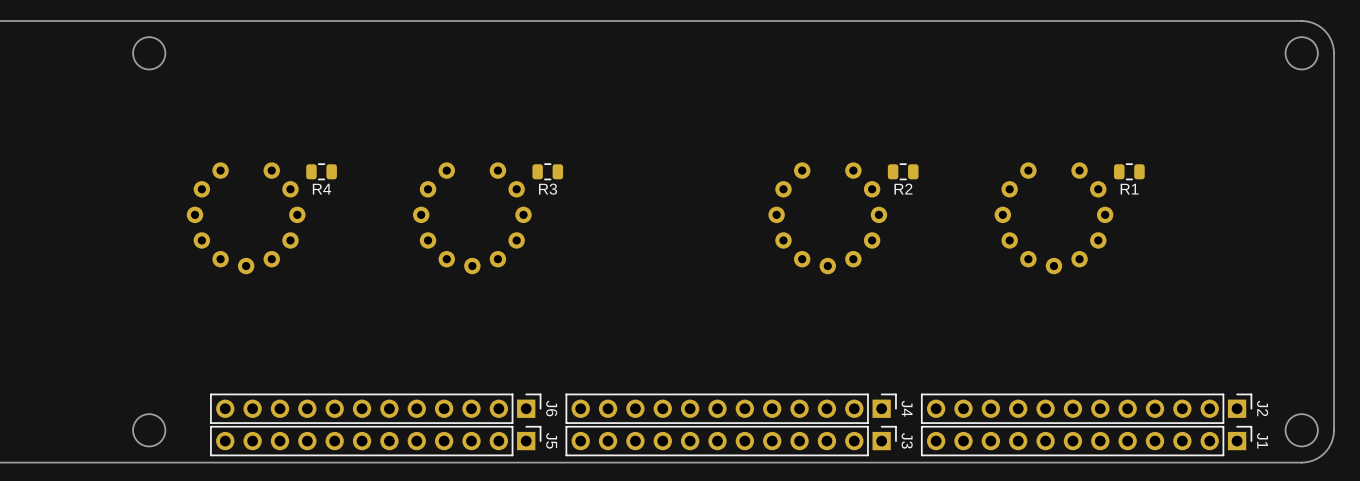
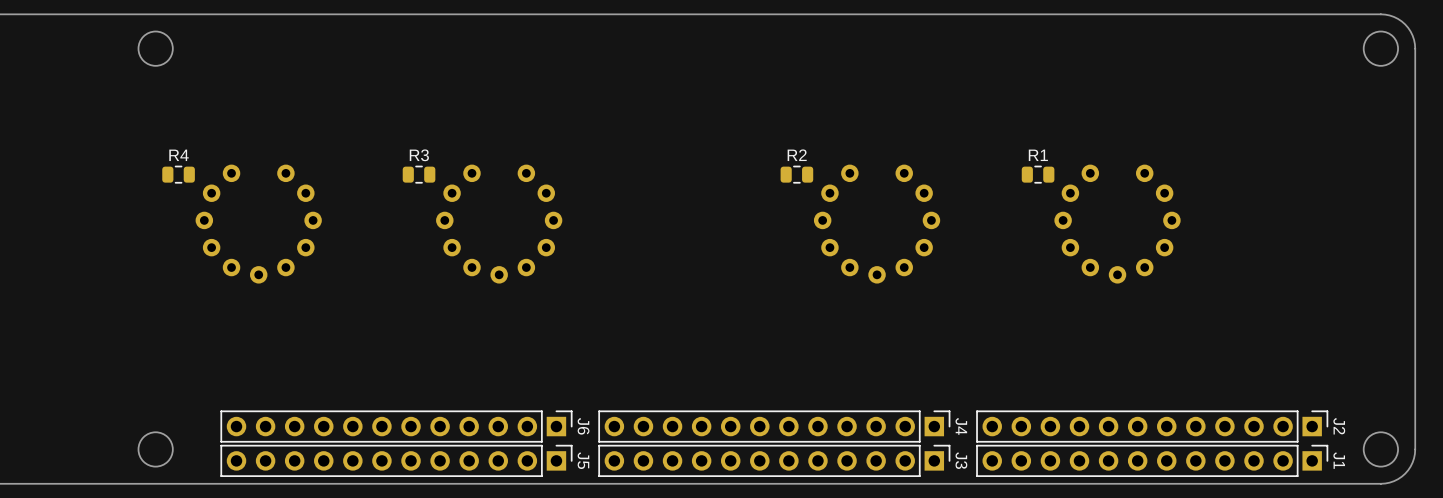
R4 position: (321, 171) -> (178, 174)
R3 position: (547, 171) -> (419, 174)
R2 position: (903, 171) -> (796, 174)
R1 position: (1129, 171) -> (1038, 174)
R4 name position: R4 (321, 189) -> R4 (179, 155)
R3 name position: R3 (548, 189) -> R3 (419, 155)
R2 name position: R2 (903, 189) -> R2 (797, 155)
R1 name position: R1 (1129, 189) -> R1 (1038, 155)

